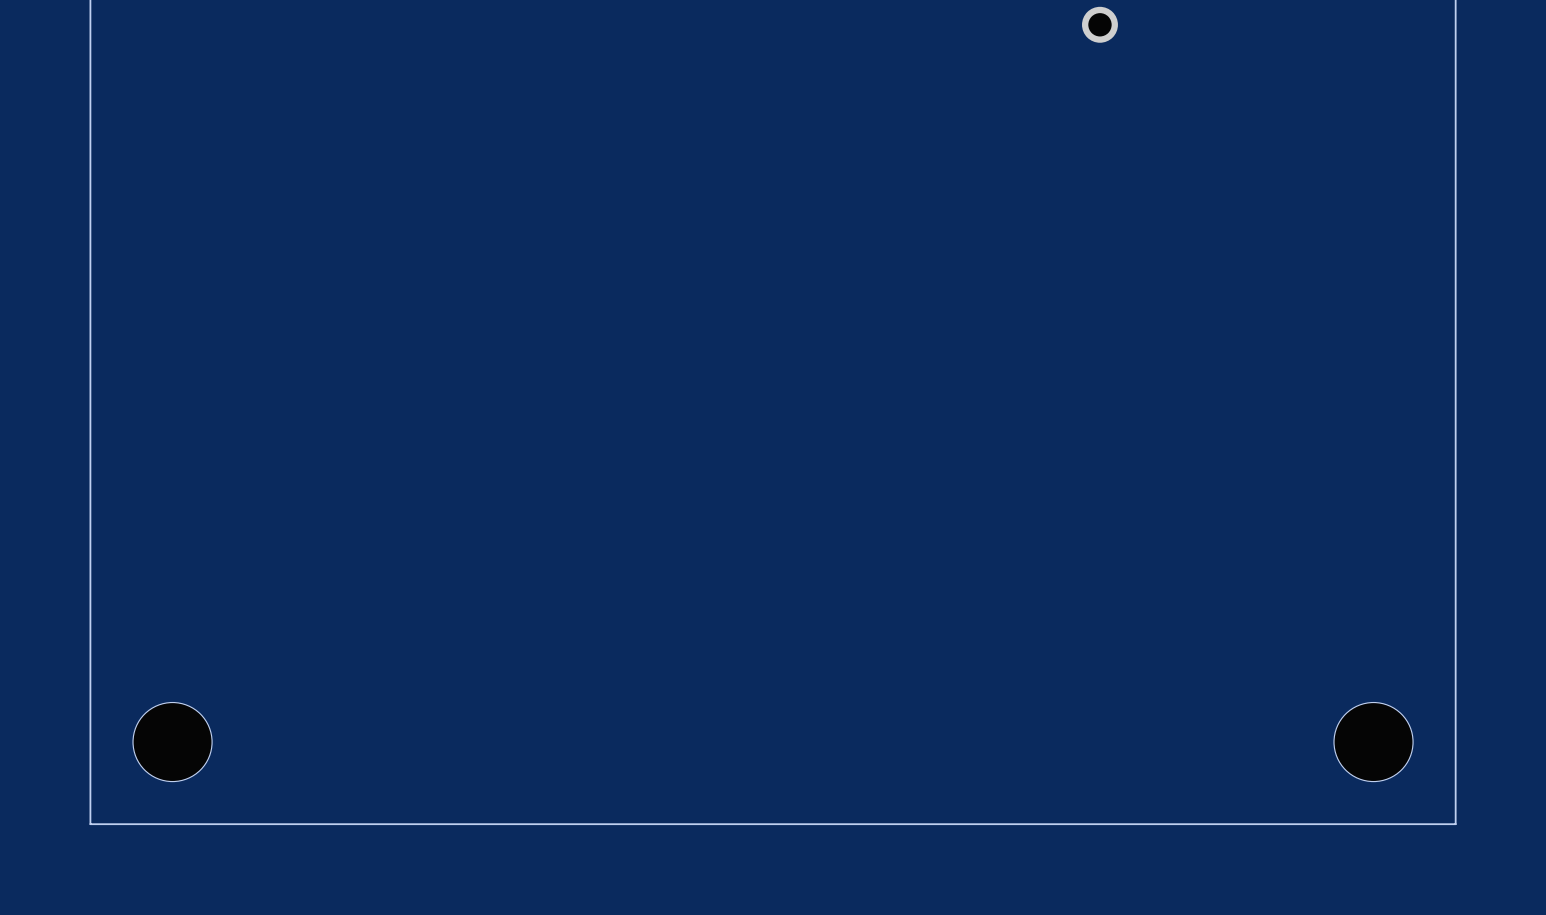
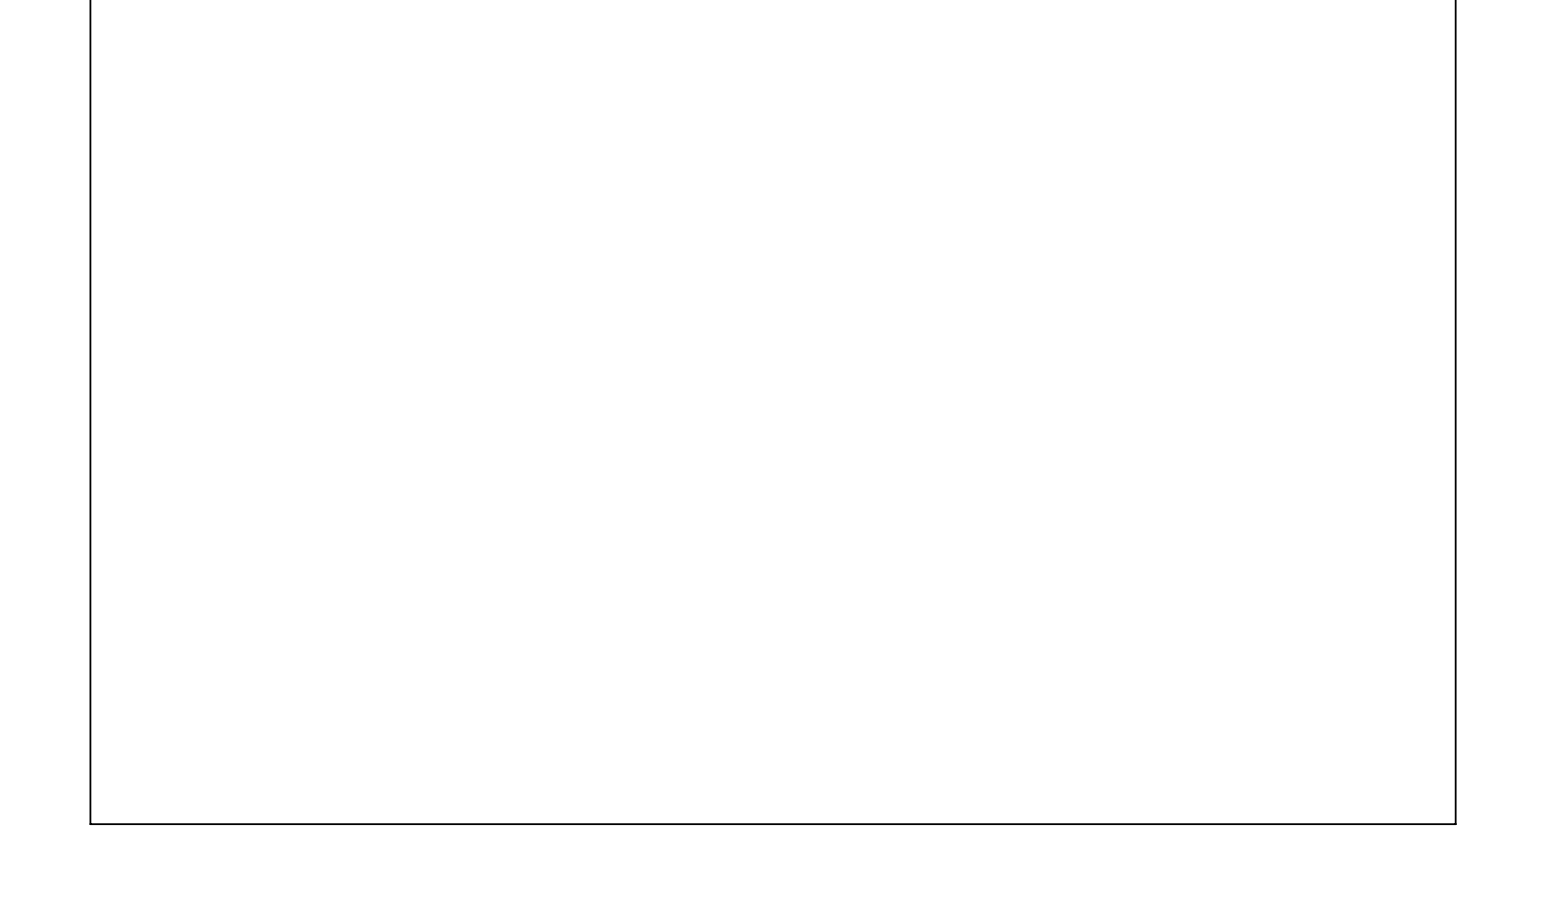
part: (1099, 24) -> none
part: (172, 742) -> none
part: (1373, 742) -> none

